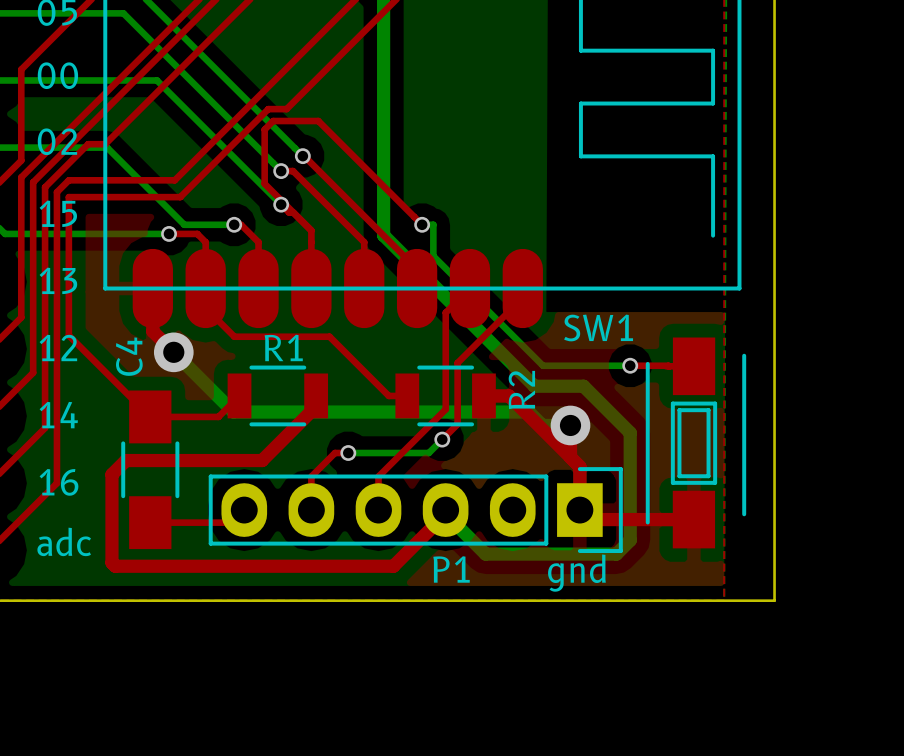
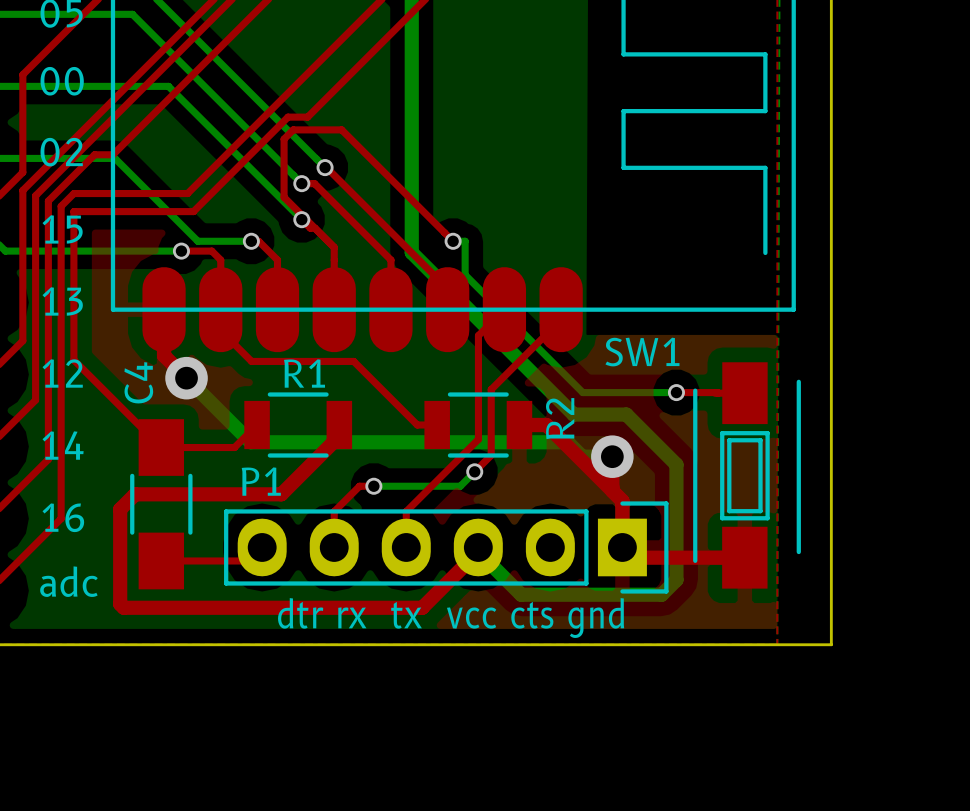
P1 name position: P1 (451, 569) -> P1 (261, 481)
text: gnd (576, 573) -> none
text: none -> dtr rx tx vcc cts gnd (451, 618)

